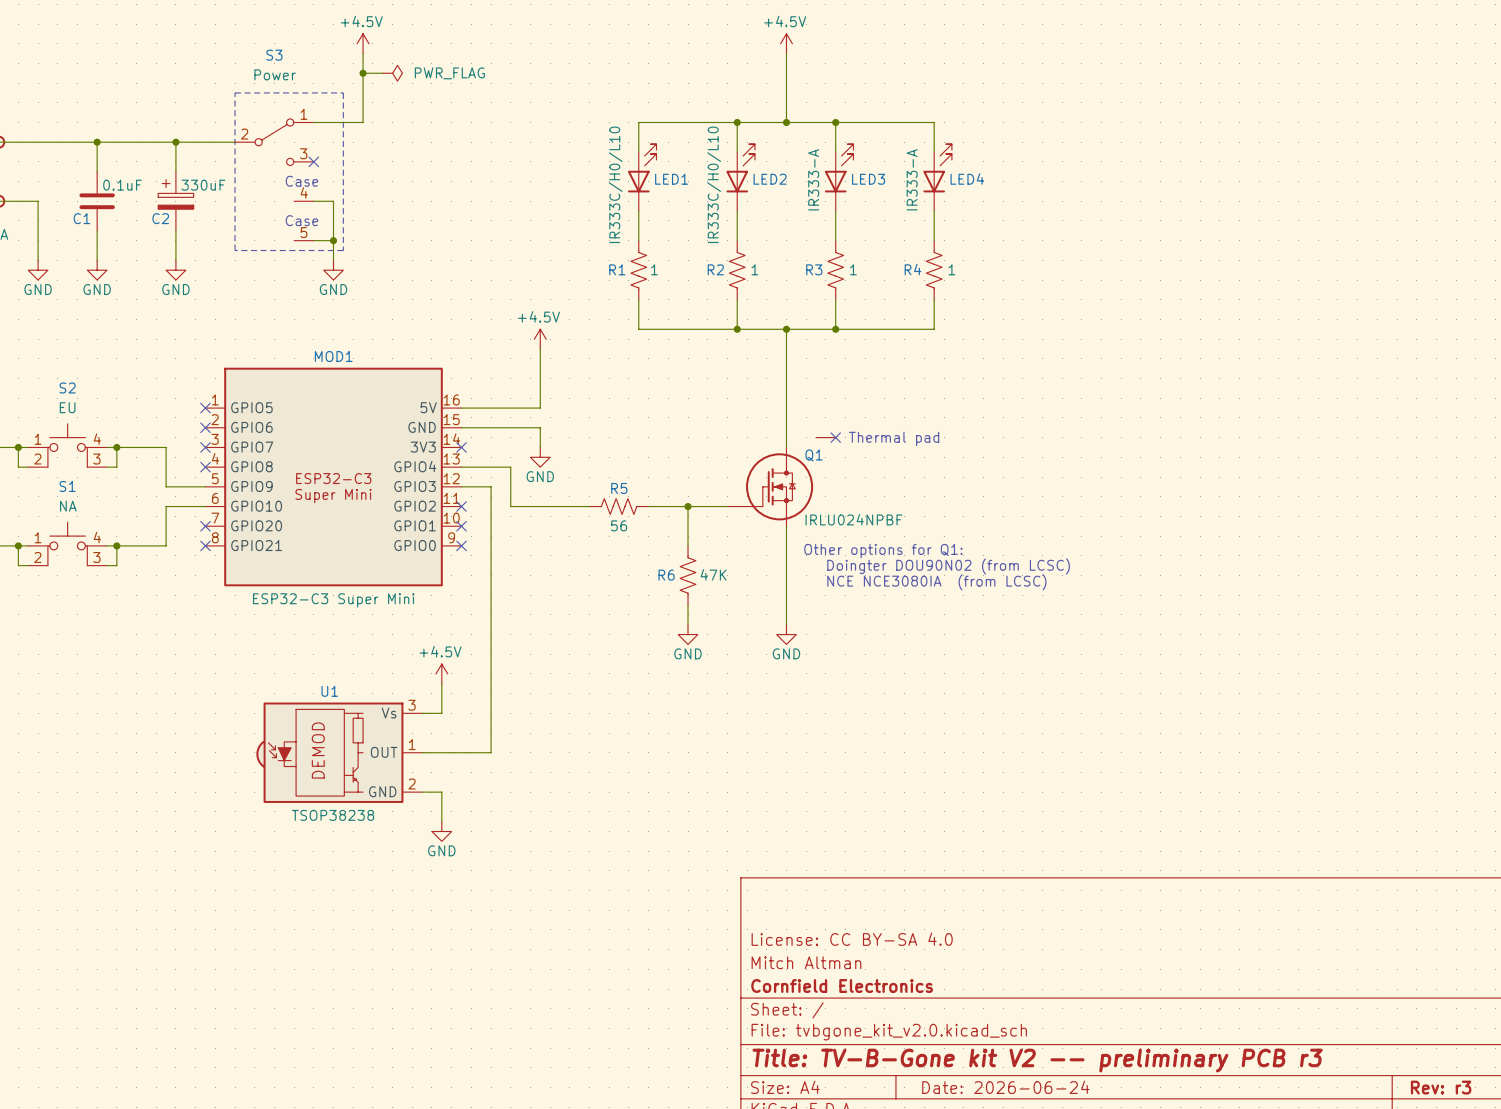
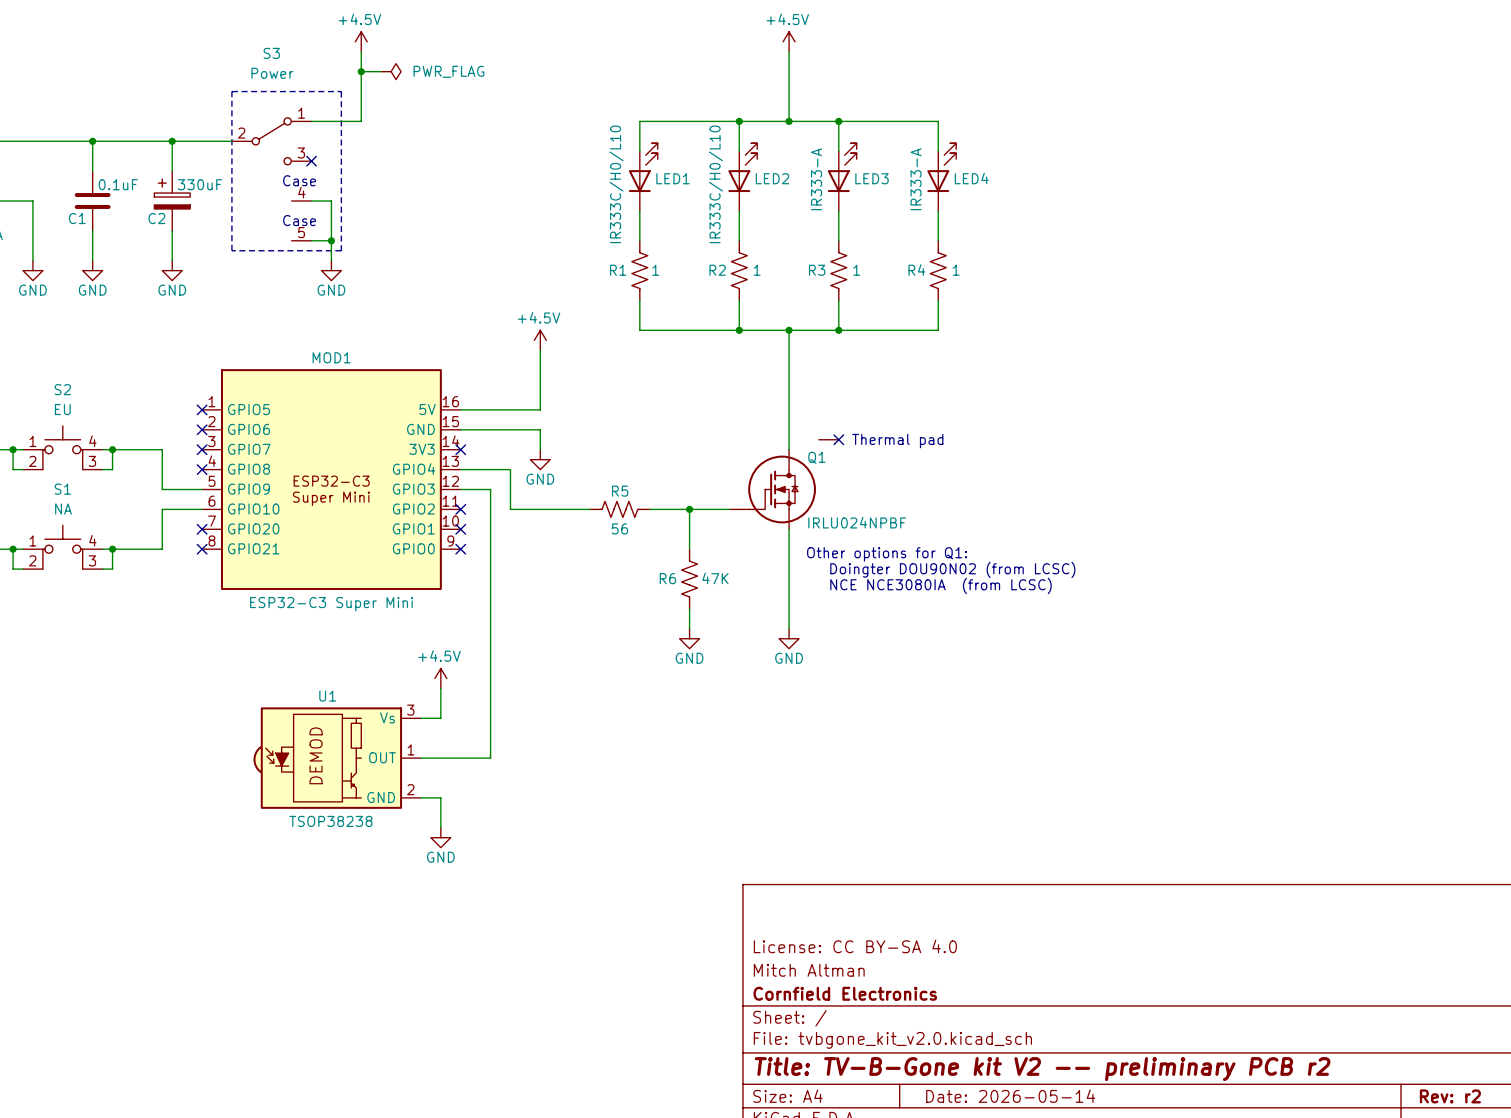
title block: Title: TV-B-Gone kit V2 -- preliminary PCB r3 (1037, 1060) -> Title: TV-B-Gone kit V2 -- preliminary PCB r2 (1042, 1069)
title block: Date: 2026-06-24 (1005, 1087) -> Date: 2026-05-14 (1010, 1096)
title block: Rev: r3 (1441, 1087) -> Rev: r2 (1450, 1096)

